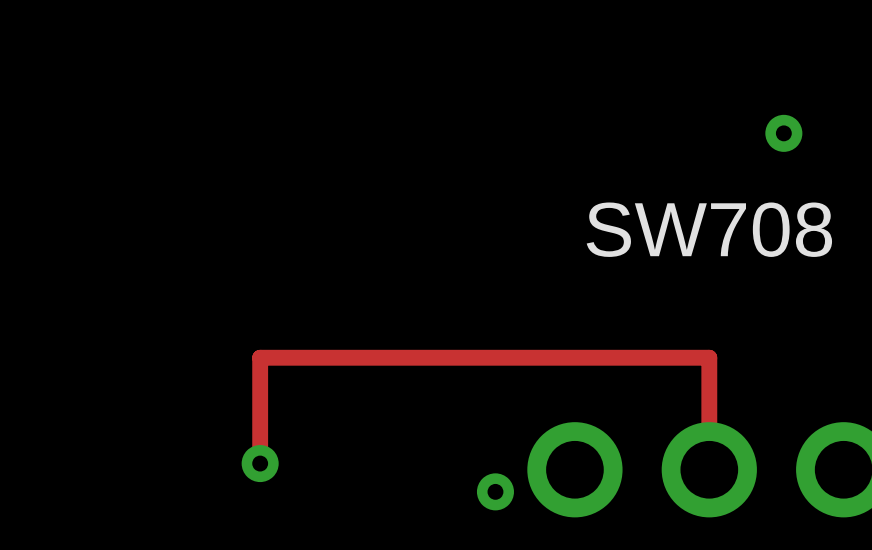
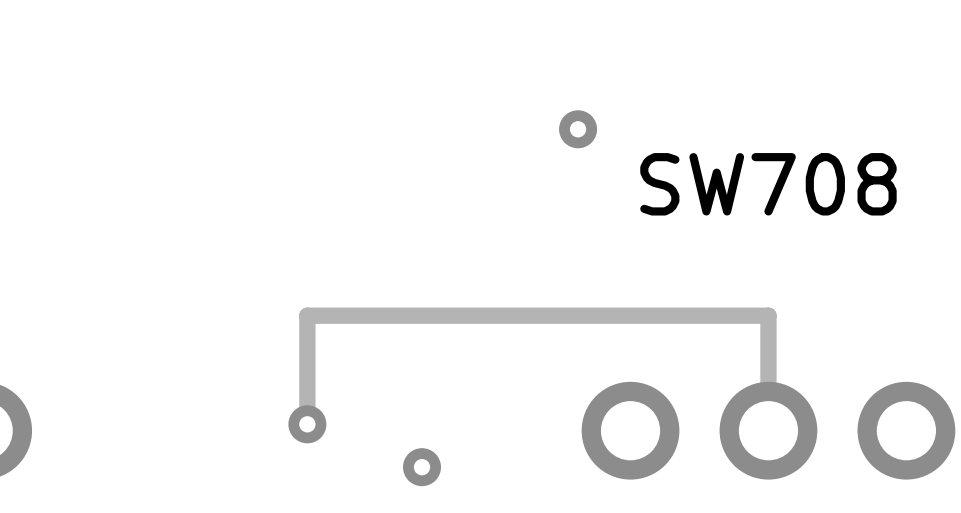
via: (783, 133) -> none
via: none -> (578, 129)
via position: (495, 491) -> (422, 467)

